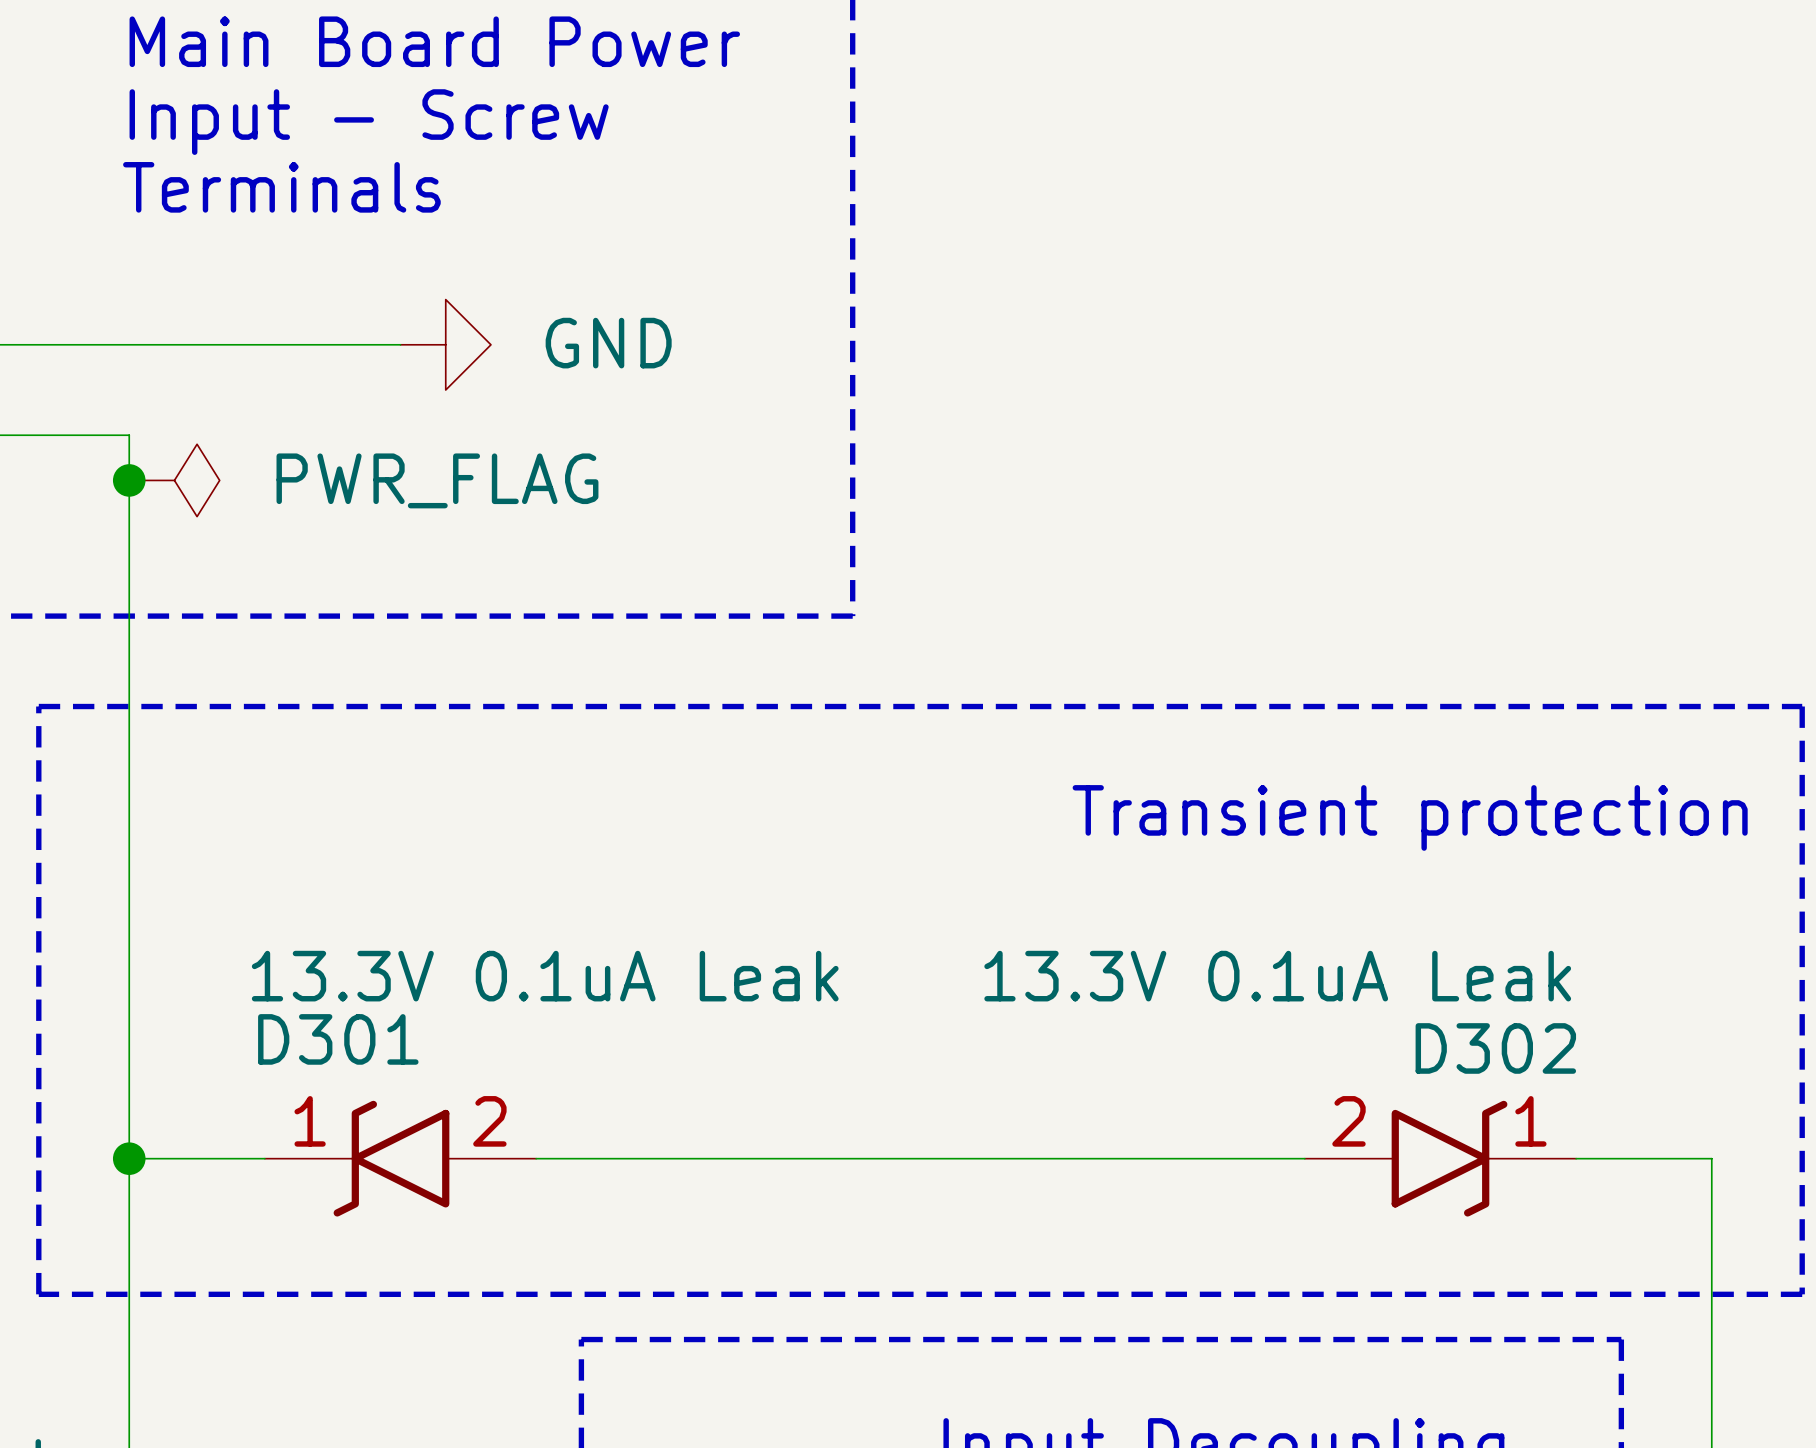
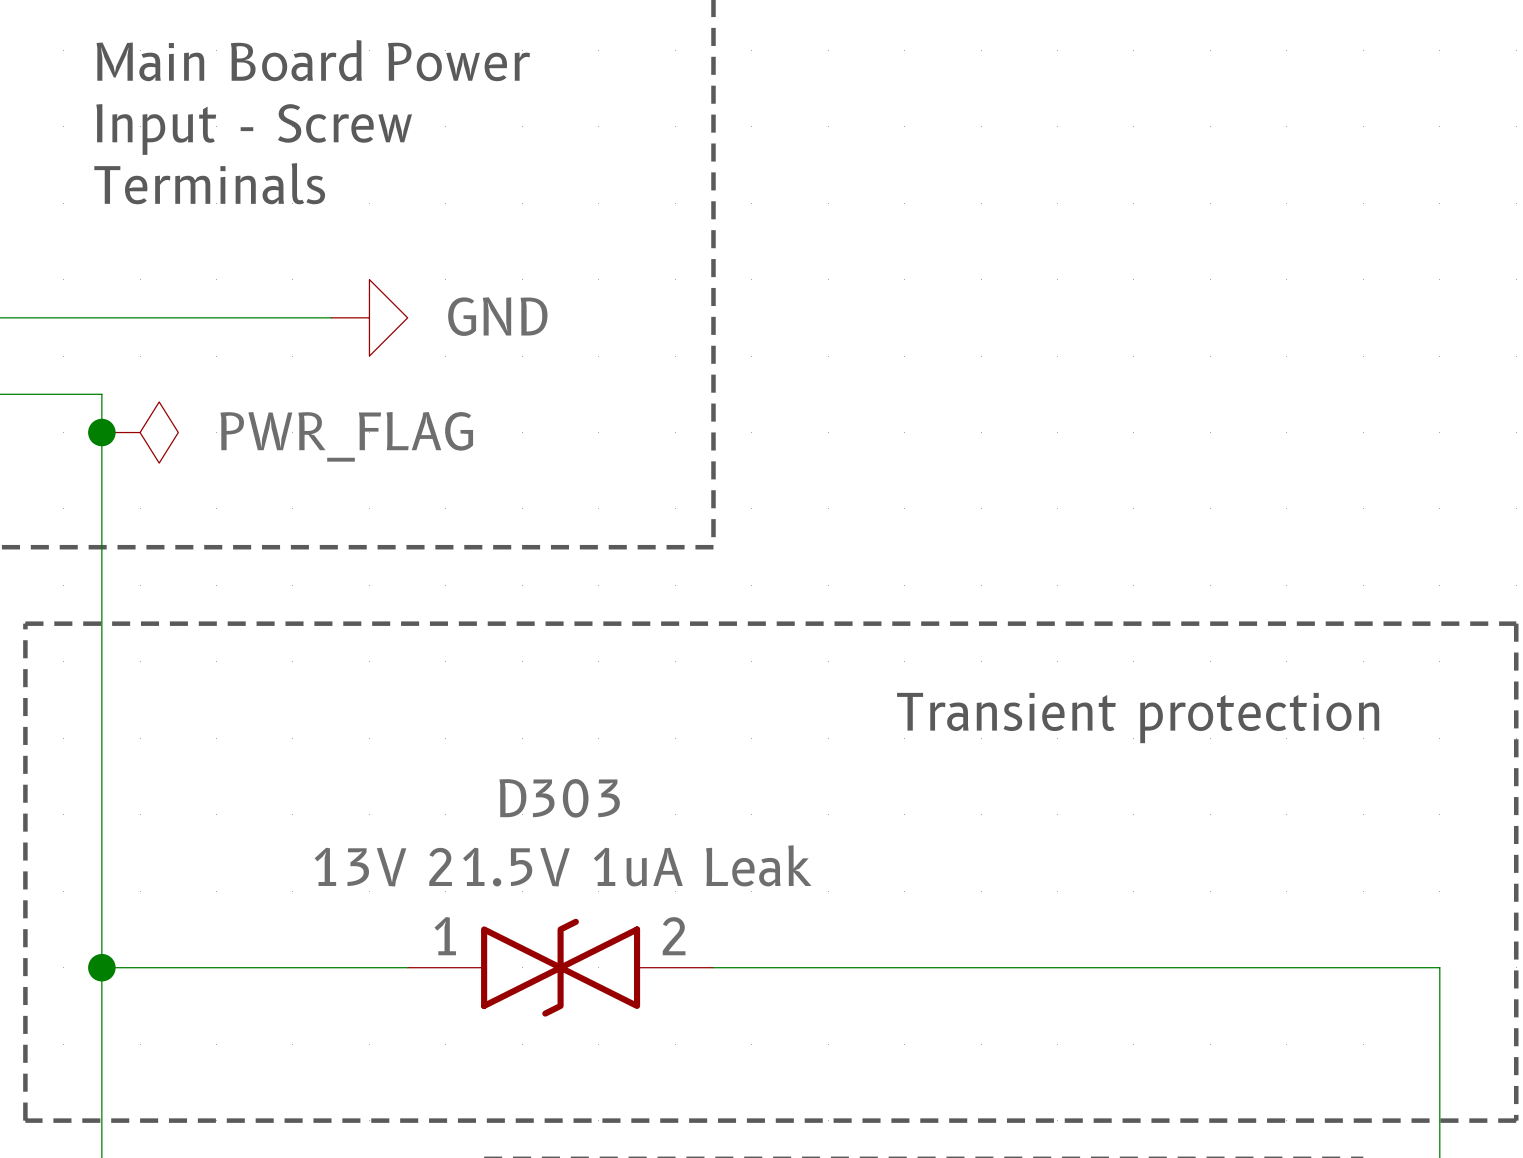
wire: none -> (101, 967) (407, 967)
D303: none -> 13V 21.5V 1uA Leak (560, 967)
wire: (129, 1158) (264, 1158) -> none
junction position: (129, 1158) -> (101, 967)
D301: 13.3V 0.1uA Leak (400, 1158) -> none
wire: (536, 1158) (1304, 1158) -> none
D302: 13.3V 0.1uA Leak (1440, 1158) -> none
wire: (1576, 1158) (1711, 1158) -> (713, 967) (1439, 967) (1439, 1005)

